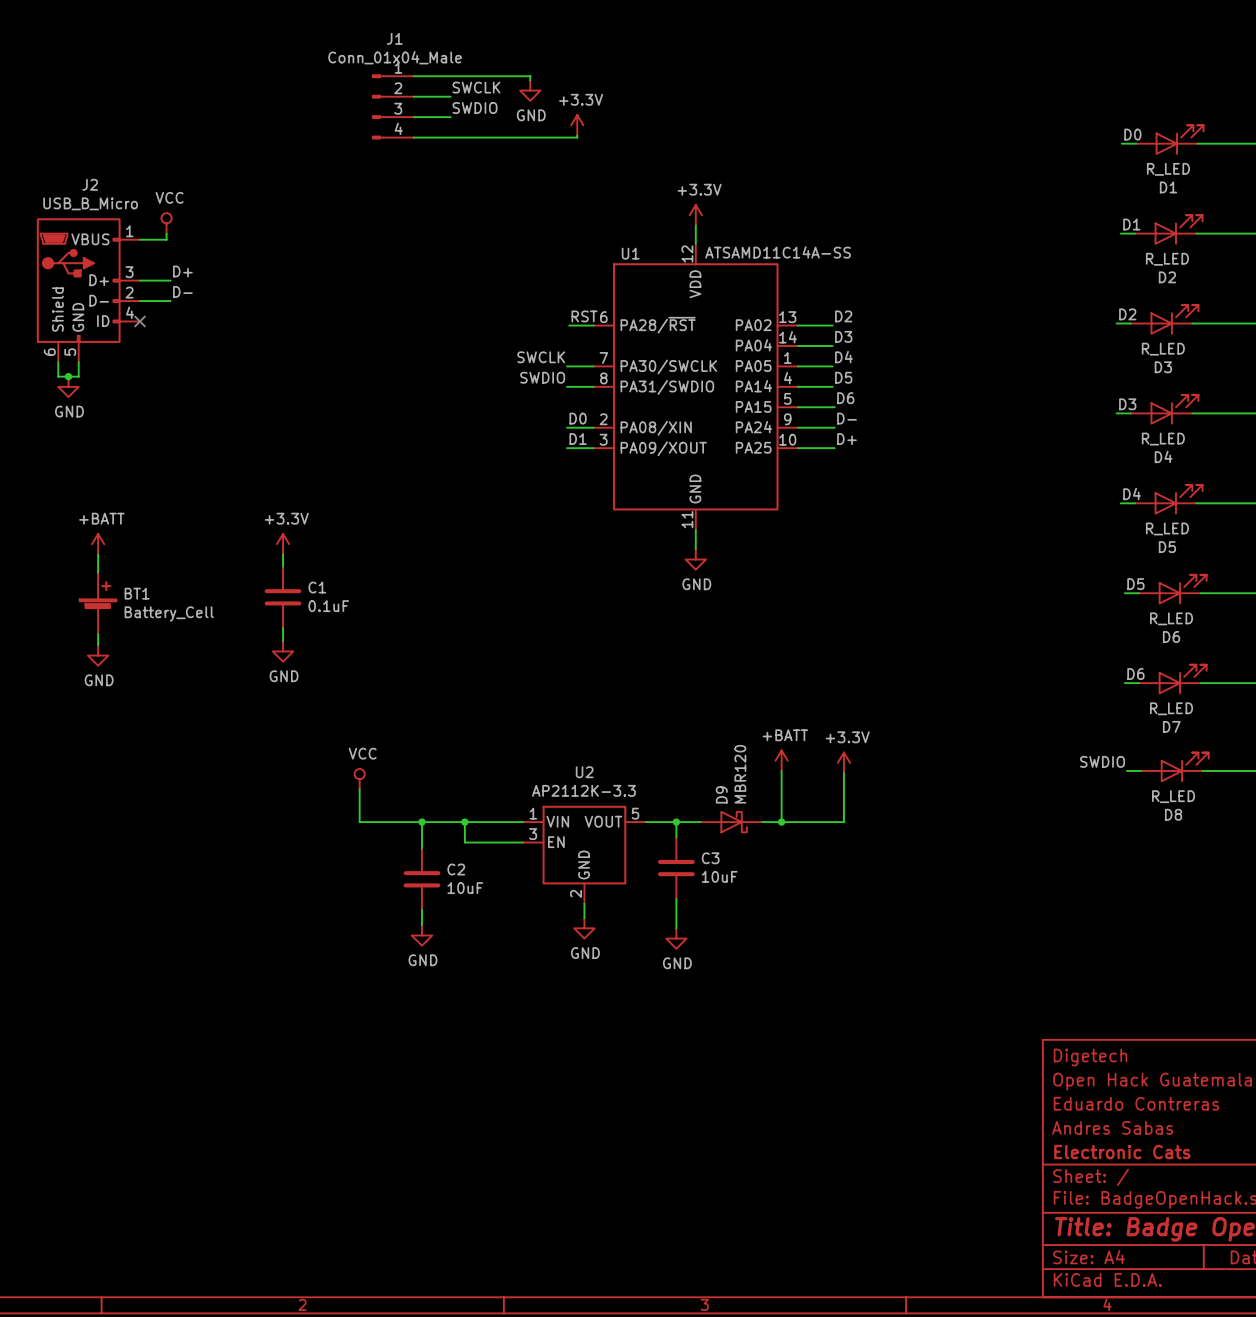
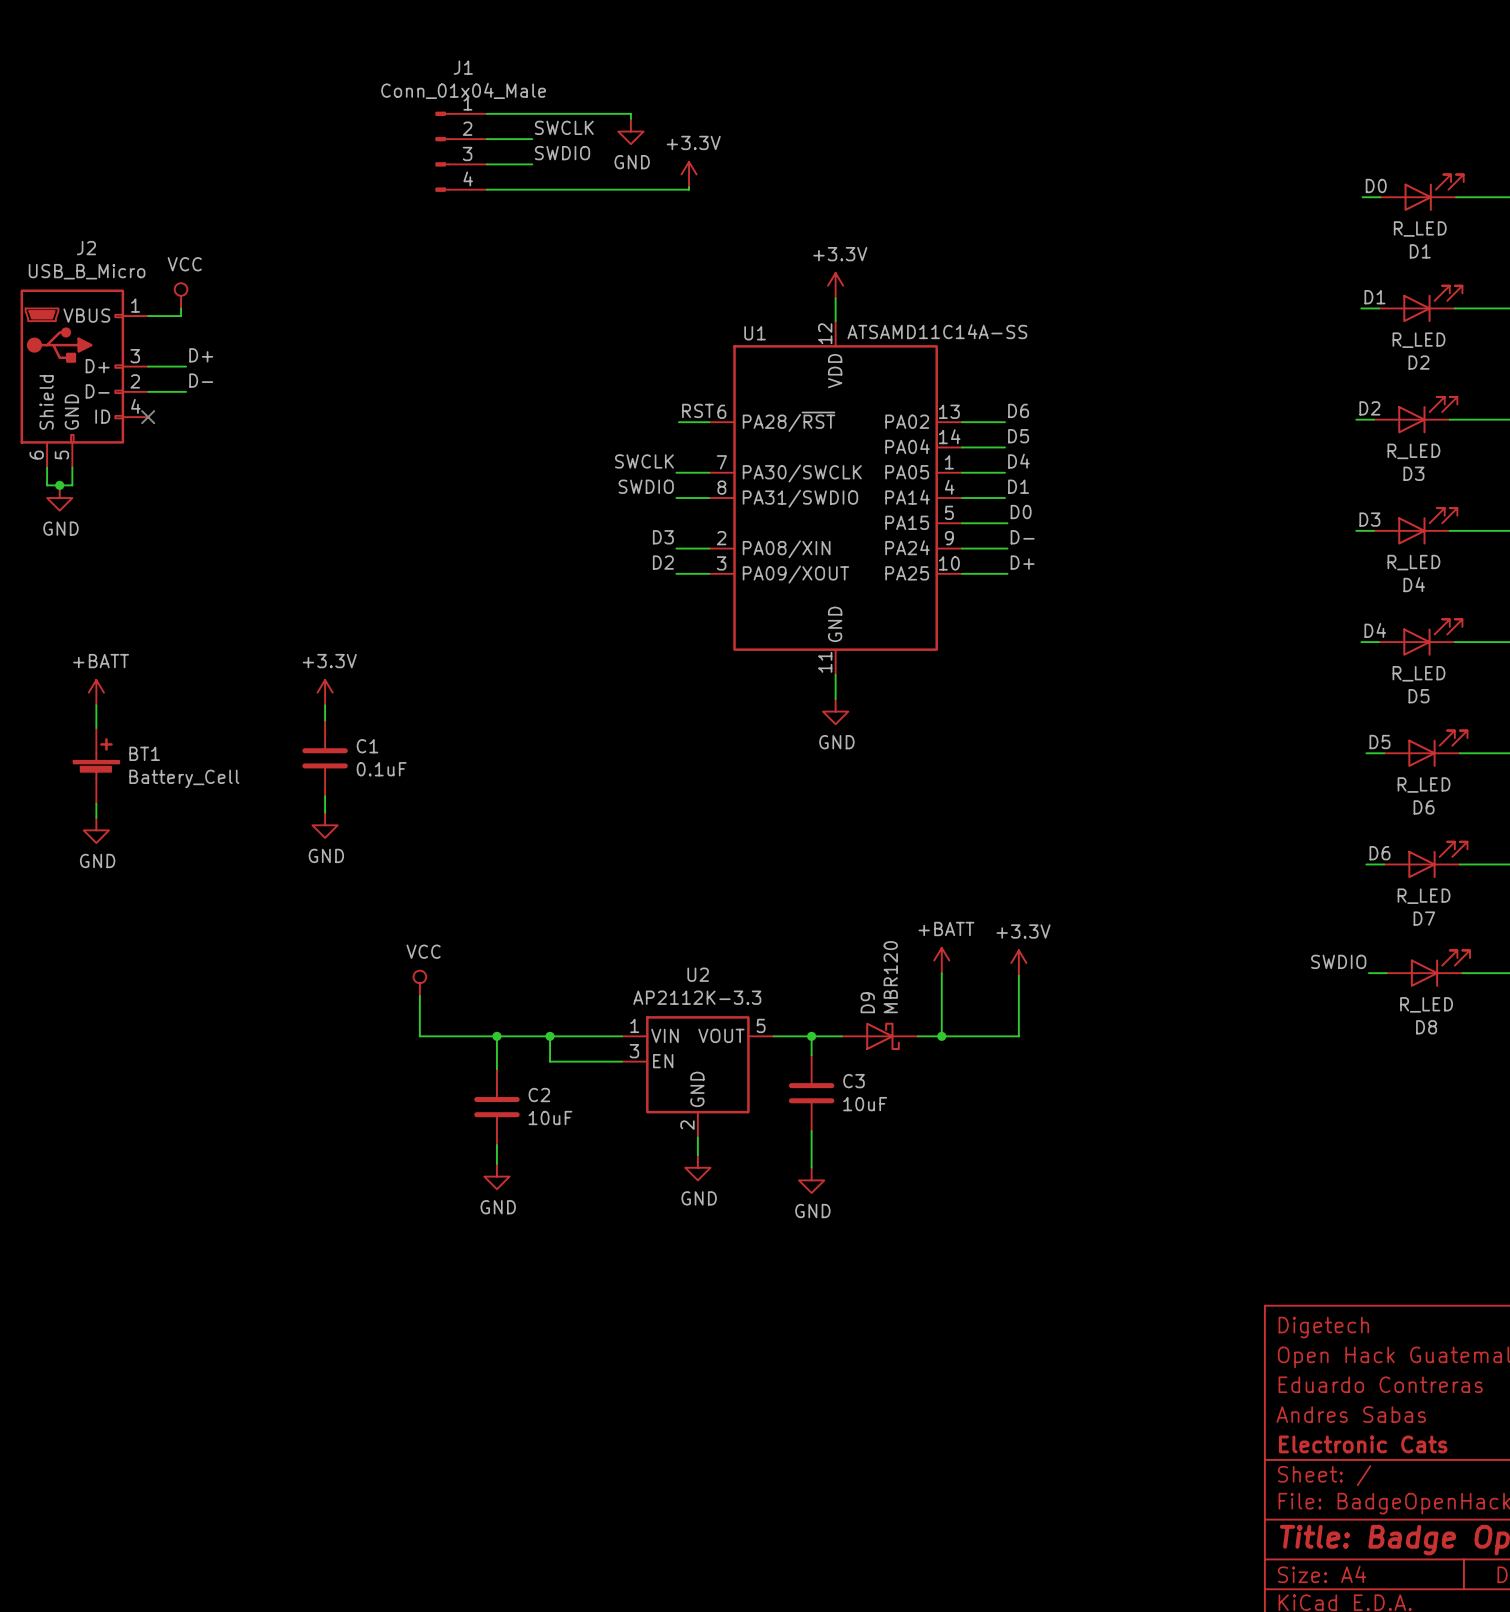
label: D2 (843, 316) -> D6 (1018, 410)
label: D3 (843, 336) -> D5 (1018, 436)
label: D5 (843, 377) -> D1 (1018, 486)
label: D6 (845, 398) -> D0 (1021, 512)
label: D0 (578, 418) -> D3 (663, 537)
label: D1 (578, 439) -> D2 (663, 562)

